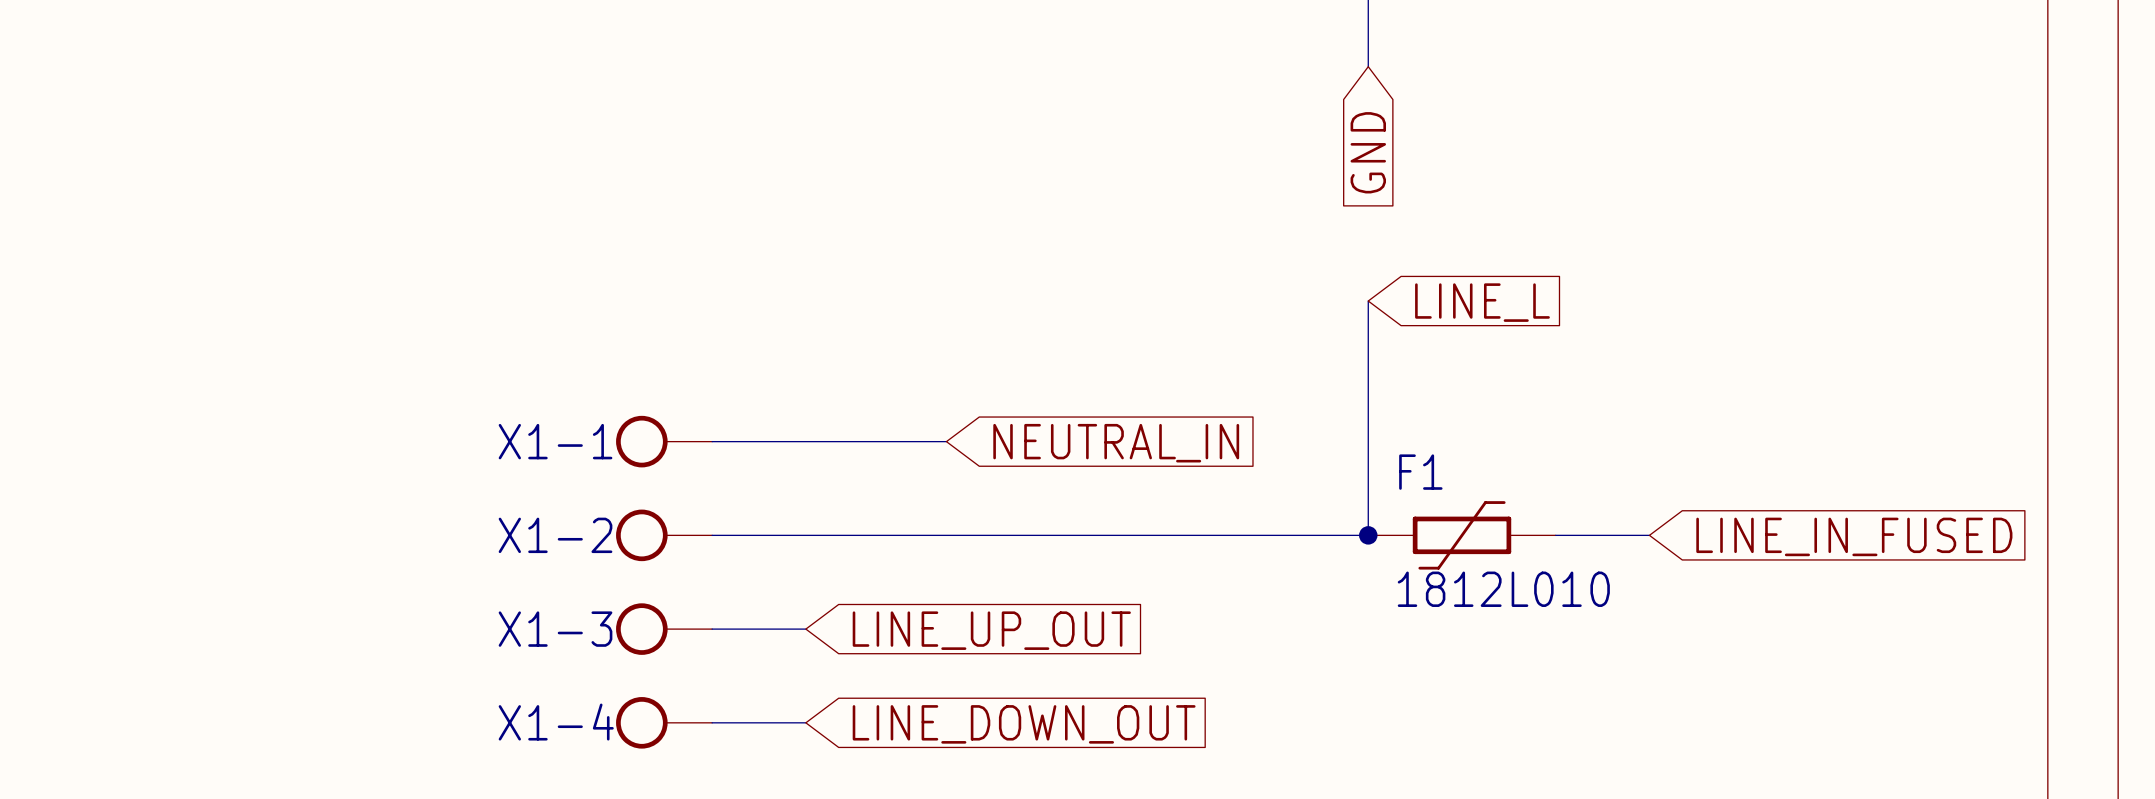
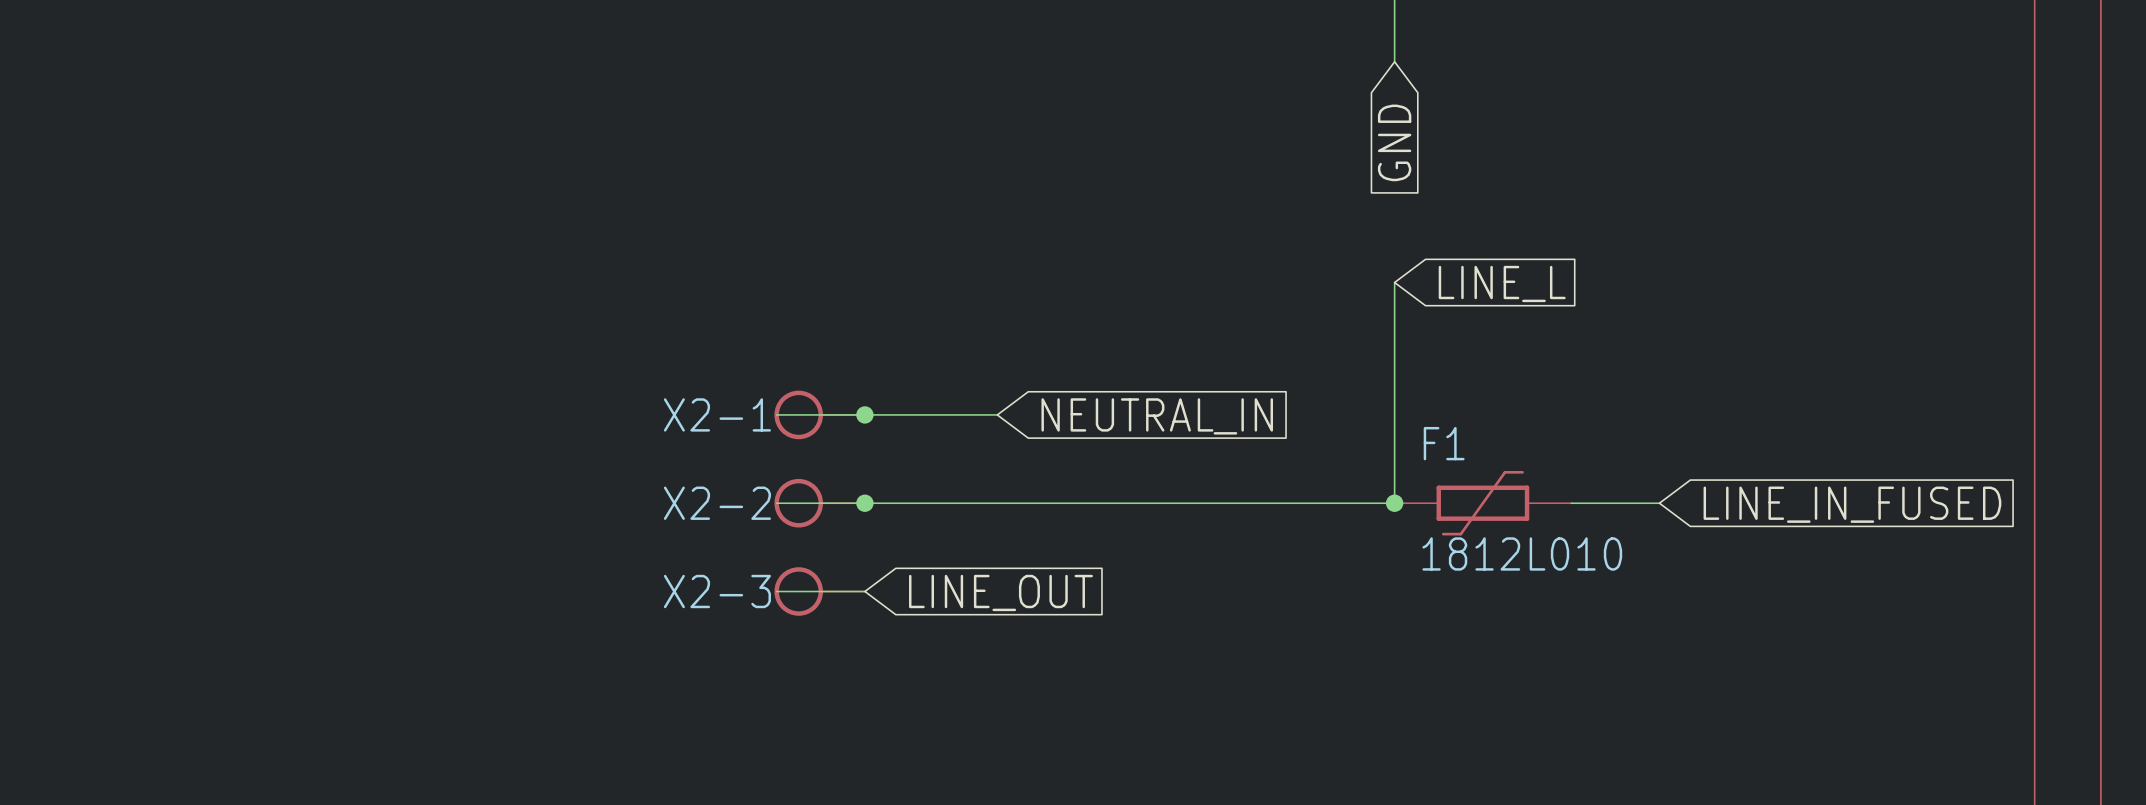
X1-1: (664, 441) -> none
X2-1: none -> (819, 414)
junction: none -> (864, 414)
X1-2: (664, 535) -> none
X2-2: none -> (819, 503)
junction: none -> (864, 503)
X1-3: (664, 629) -> none
X2-3: none -> (819, 591)
global label: LINE_UP_OUT (991, 630) -> LINE_OUT (1000, 592)
X1-4: (664, 722) -> none
wire: (712, 722) (805, 722) -> none
global label: LINE_DOWN_OUT (1024, 724) -> none

